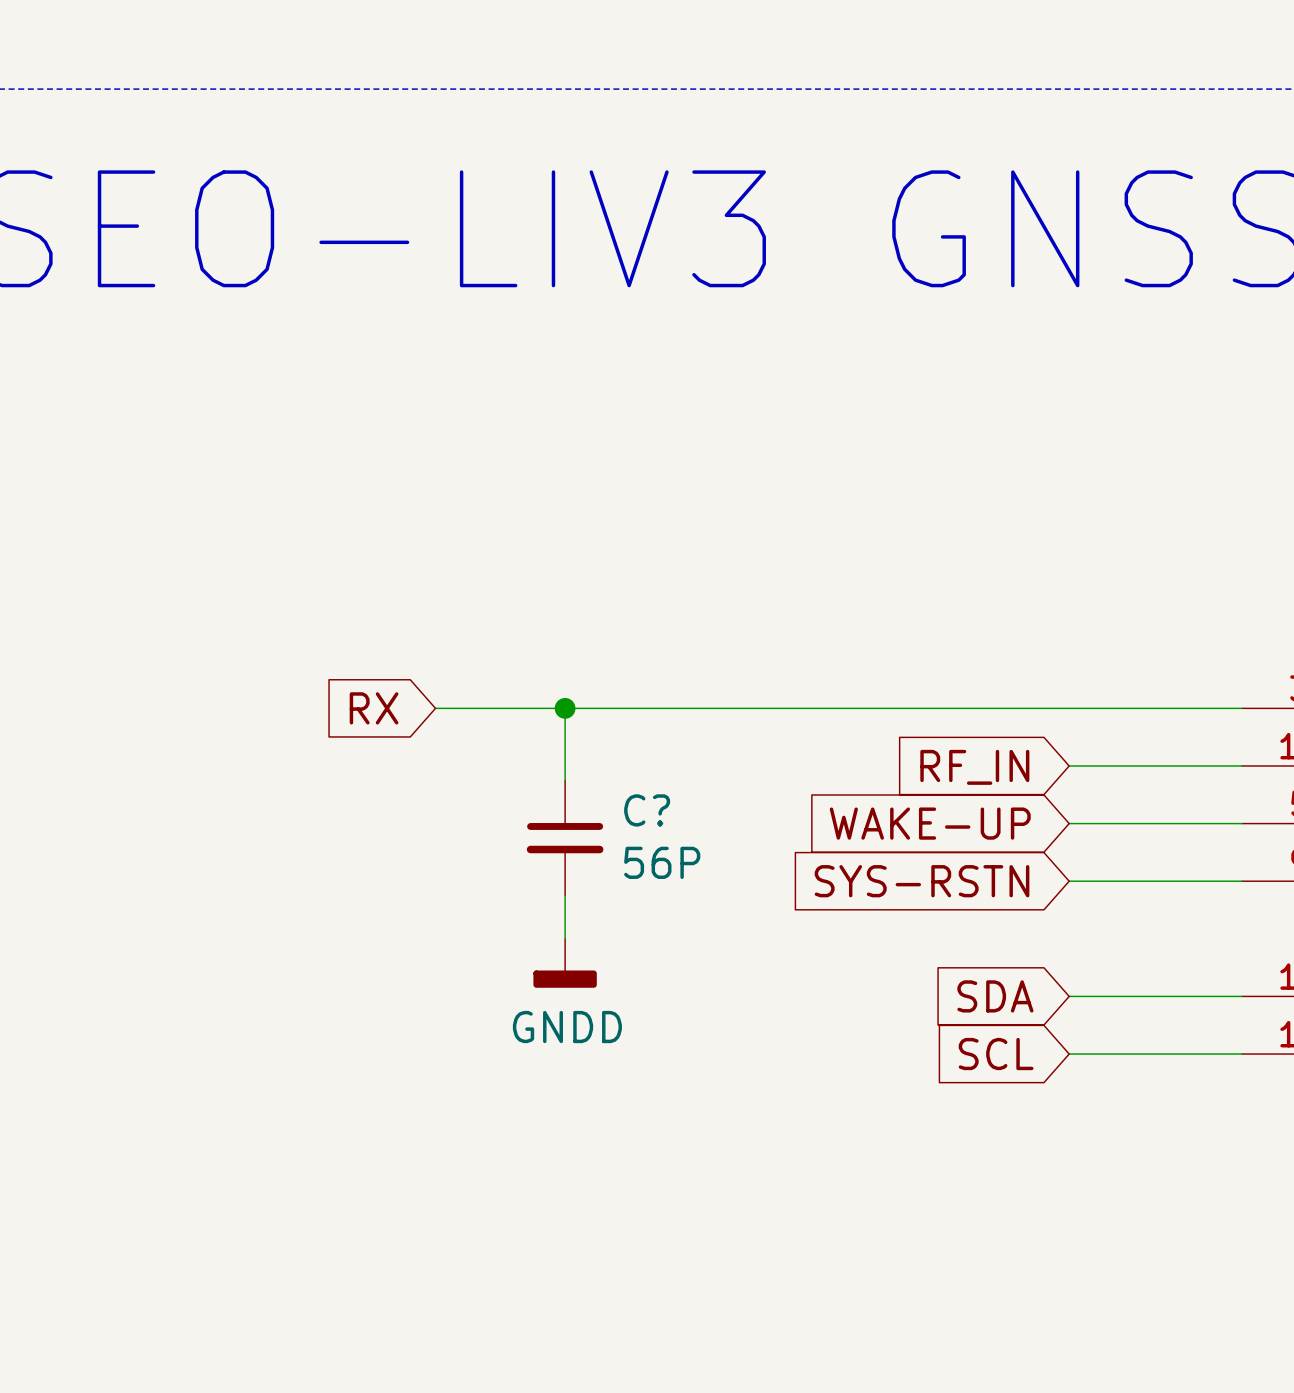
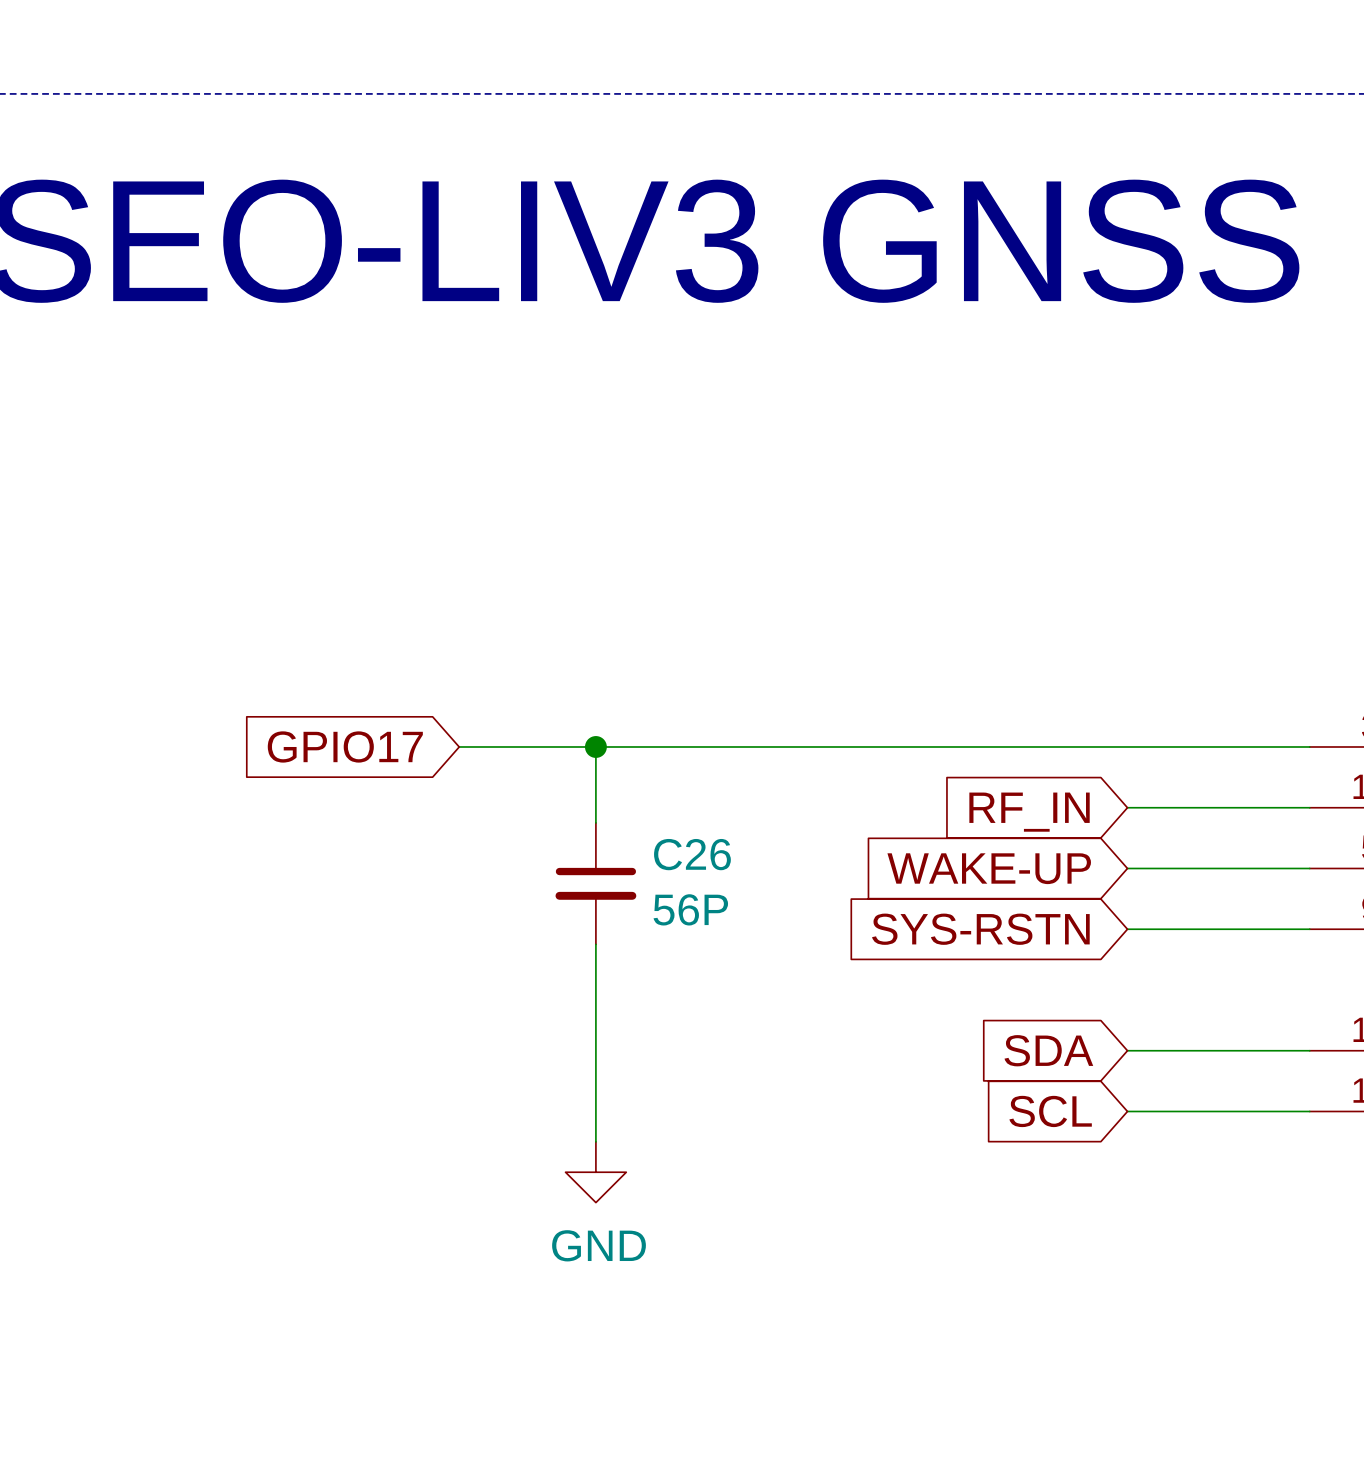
global label: RX (374, 708) -> GPIO17 (345, 746)
C? name: C? (647, 810) -> C26 (692, 854)
wire: none -> (595, 989) (595, 1141)
power symbol: GNDD (565, 963) -> none
power symbol: none -> GND (595, 1172)

